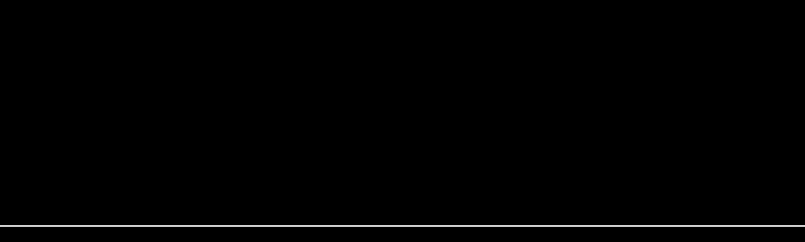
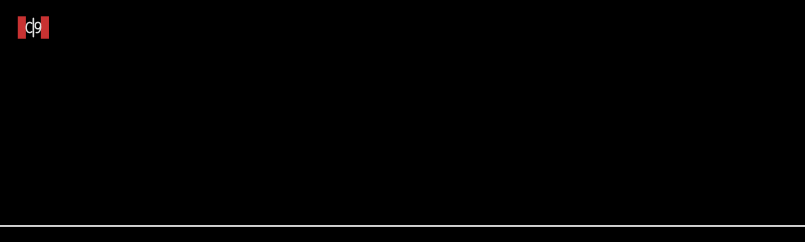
C9: none -> (33, 27)

